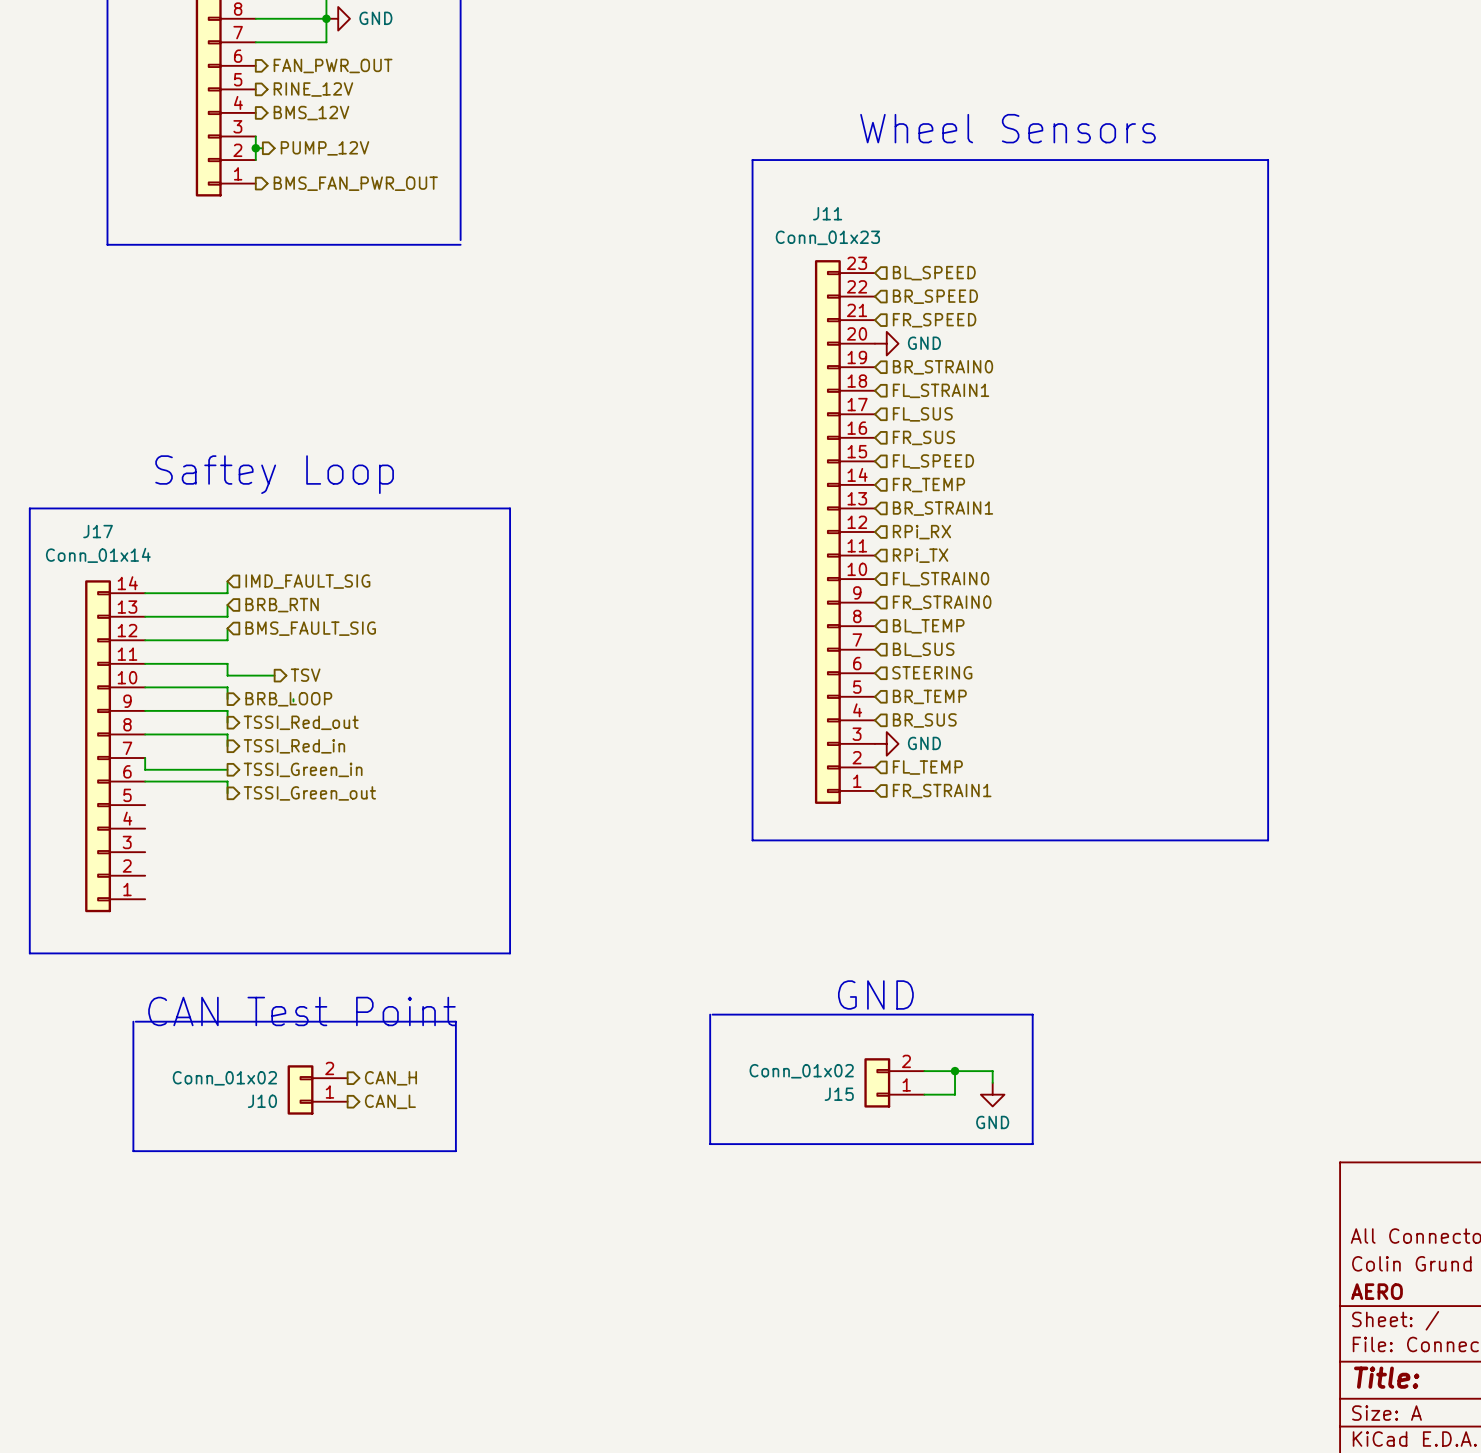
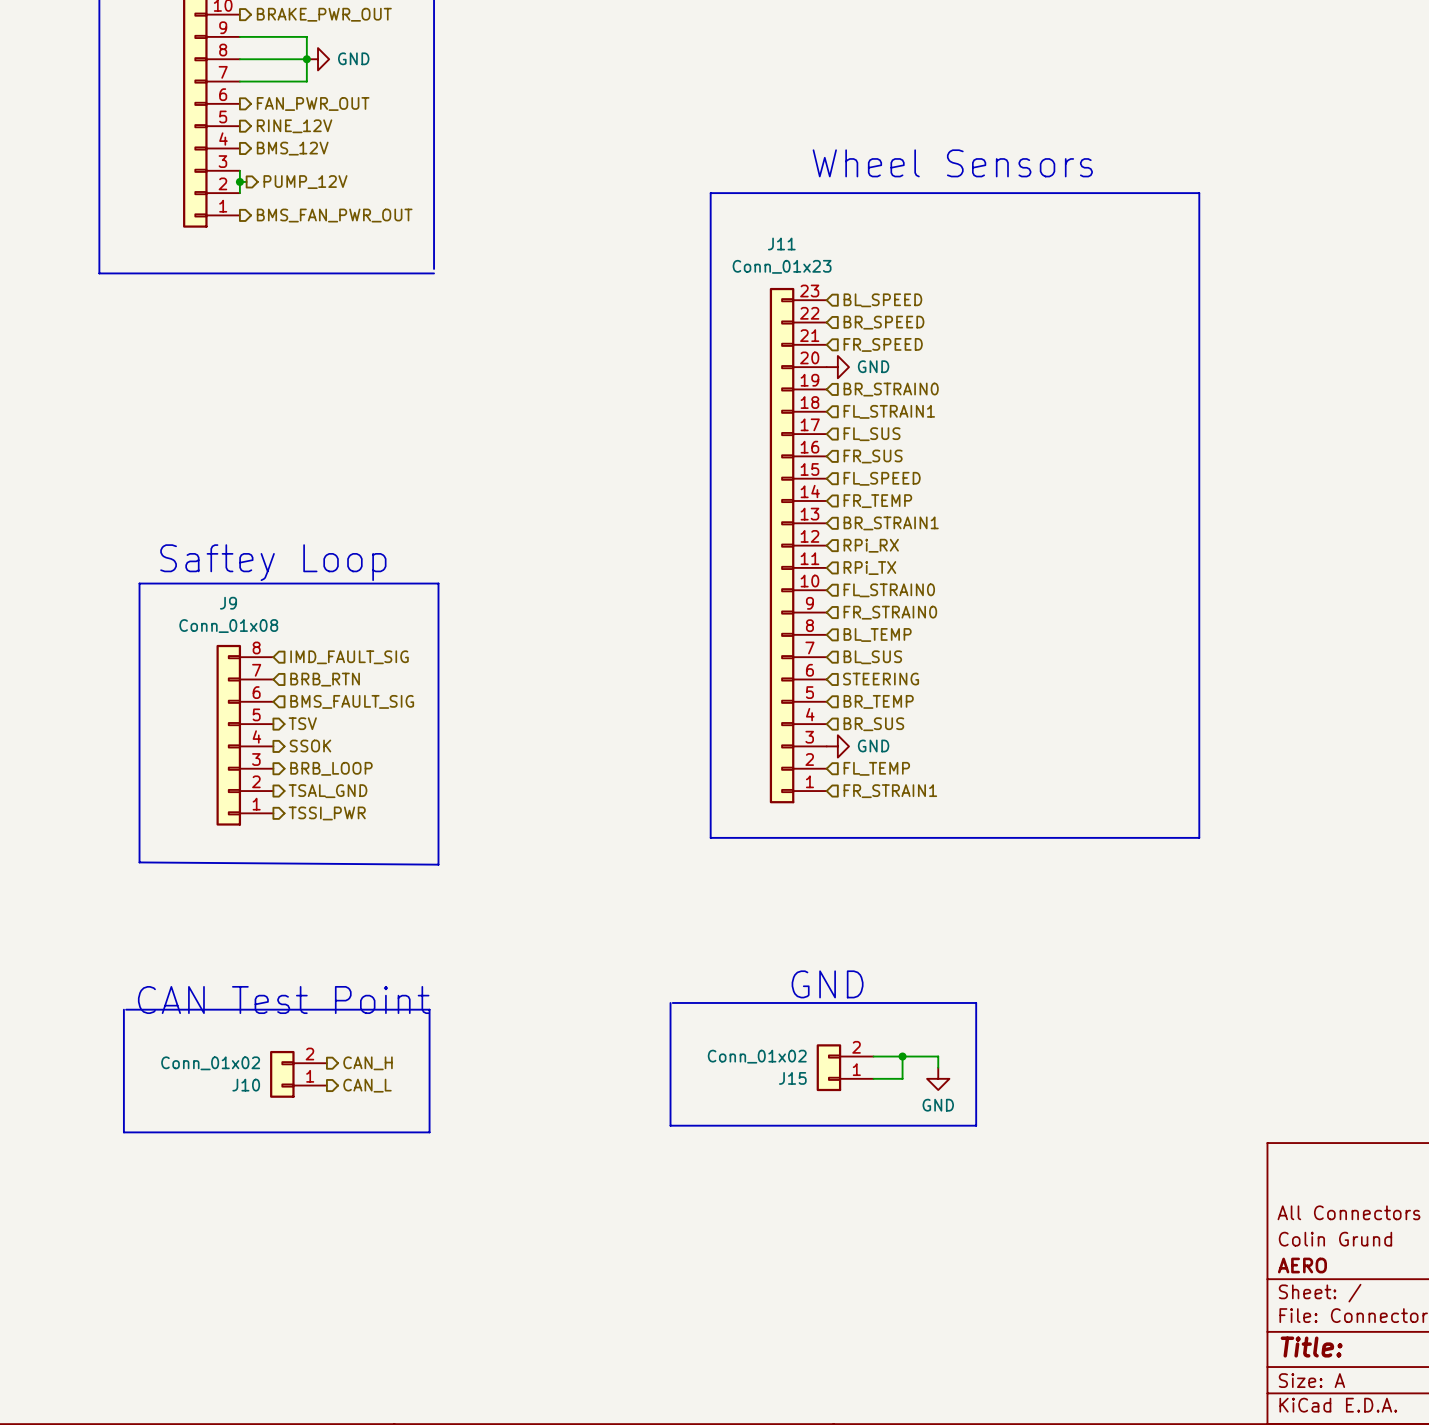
text position: Saftey Loop (274, 474) -> Saftey Loop (273, 562)
line: (29, 508) (510, 508) (510, 953) (29, 953) (29, 508) -> none
line: none -> (139, 583) (139, 862) (438, 864) (438, 583) (139, 583)
wire: (227, 581) (227, 593) (145, 593) -> none
hierarchical label position: IMD_FAULT_SIG (307, 581) -> IMD_FAULT_SIG (349, 657)
wire: (227, 604) (227, 616) (145, 616) -> none
hierarchical label position: BRB_RTN (282, 605) -> BRB_RTN (325, 679)
wire: (227, 628) (227, 640) (145, 640) -> none
hierarchical label position: BMS_FAULT_SIG (310, 628) -> BMS_FAULT_SIG (352, 701)
wire: (145, 663) (227, 663) (227, 675) (274, 675) -> none
hierarchical label position: TSV (305, 675) -> TSV (302, 723)
wire: (145, 687) (227, 687) (227, 699) -> none
hierarchical label position: BRB_LOOP (288, 699) -> BRB_LOOP (331, 768)
wire: (145, 710) (227, 710) (227, 722) -> none
hierarchical label: TSSI_Red_out (301, 722) -> none
J9: none -> Conn_01x08 (244, 735)
wire: (145, 734) (227, 734) (227, 746) -> none
hierarchical label: none -> SSOK (310, 745)
J17: Conn_01x14 (115, 746) -> none
hierarchical label: TSSI_Red_in (294, 746) -> none
wire: (145, 758) (145, 769) (227, 769) -> none
hierarchical label: TSSI_Green_in (303, 769) -> none
wire: (145, 781) (227, 781) (227, 793) -> none
hierarchical label: none -> TSAL_GND (328, 791)
hierarchical label: TSSI_Green_out (309, 793) -> none
hierarchical label: none -> TSSI_PWR (327, 813)

